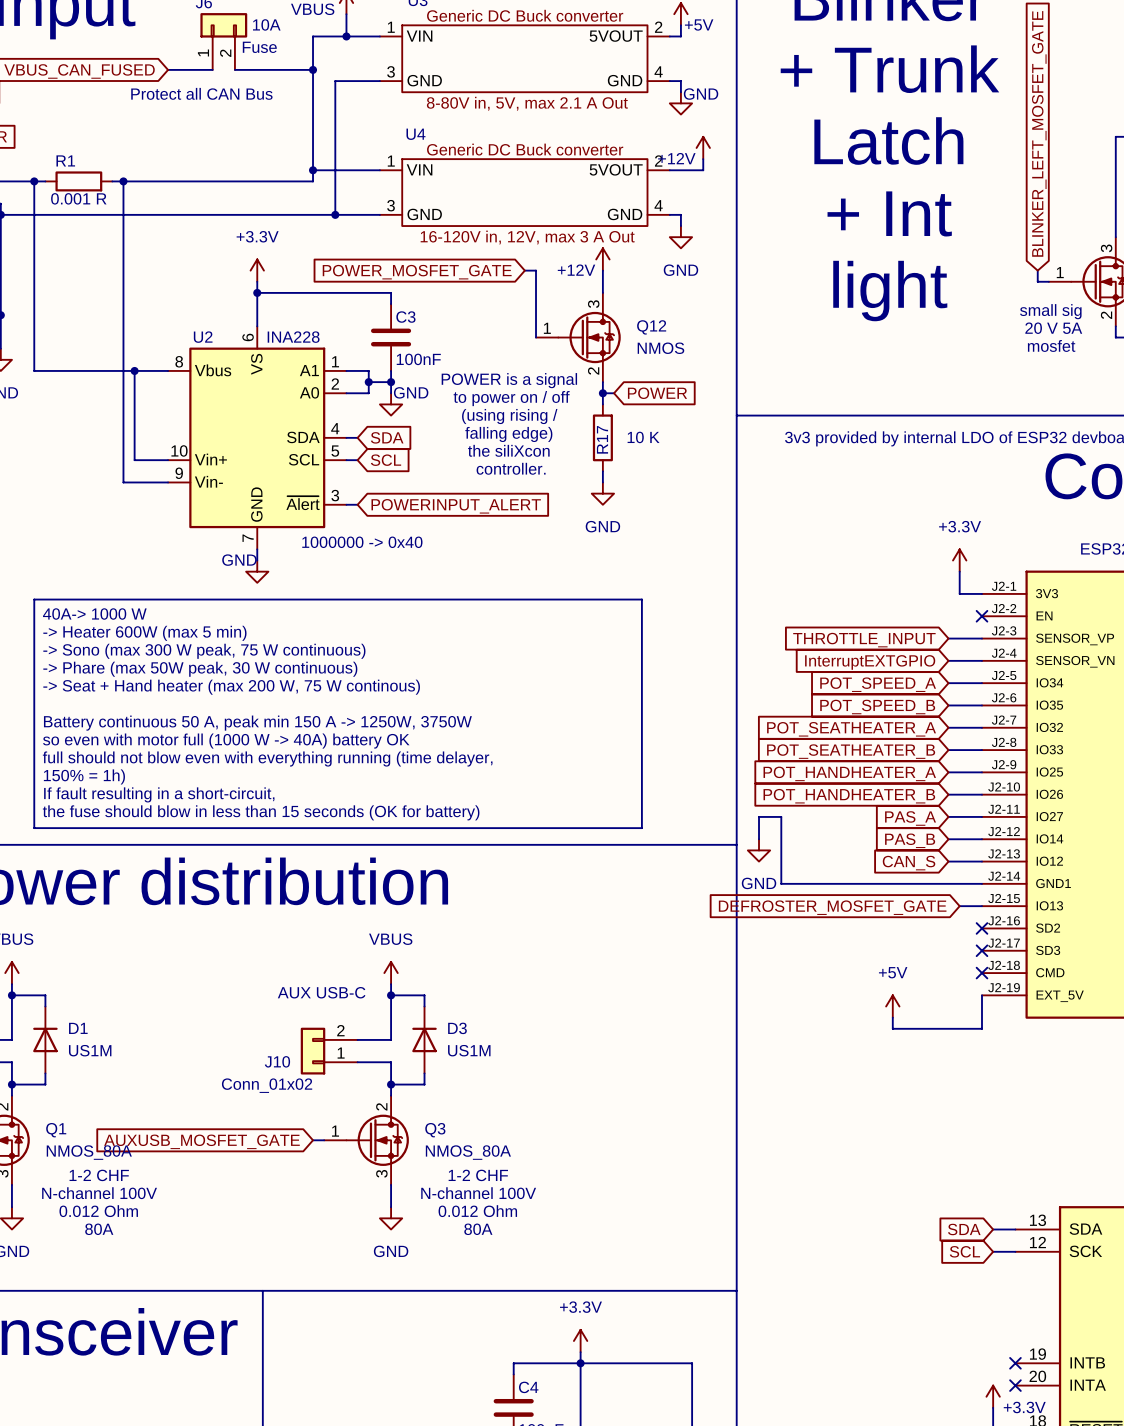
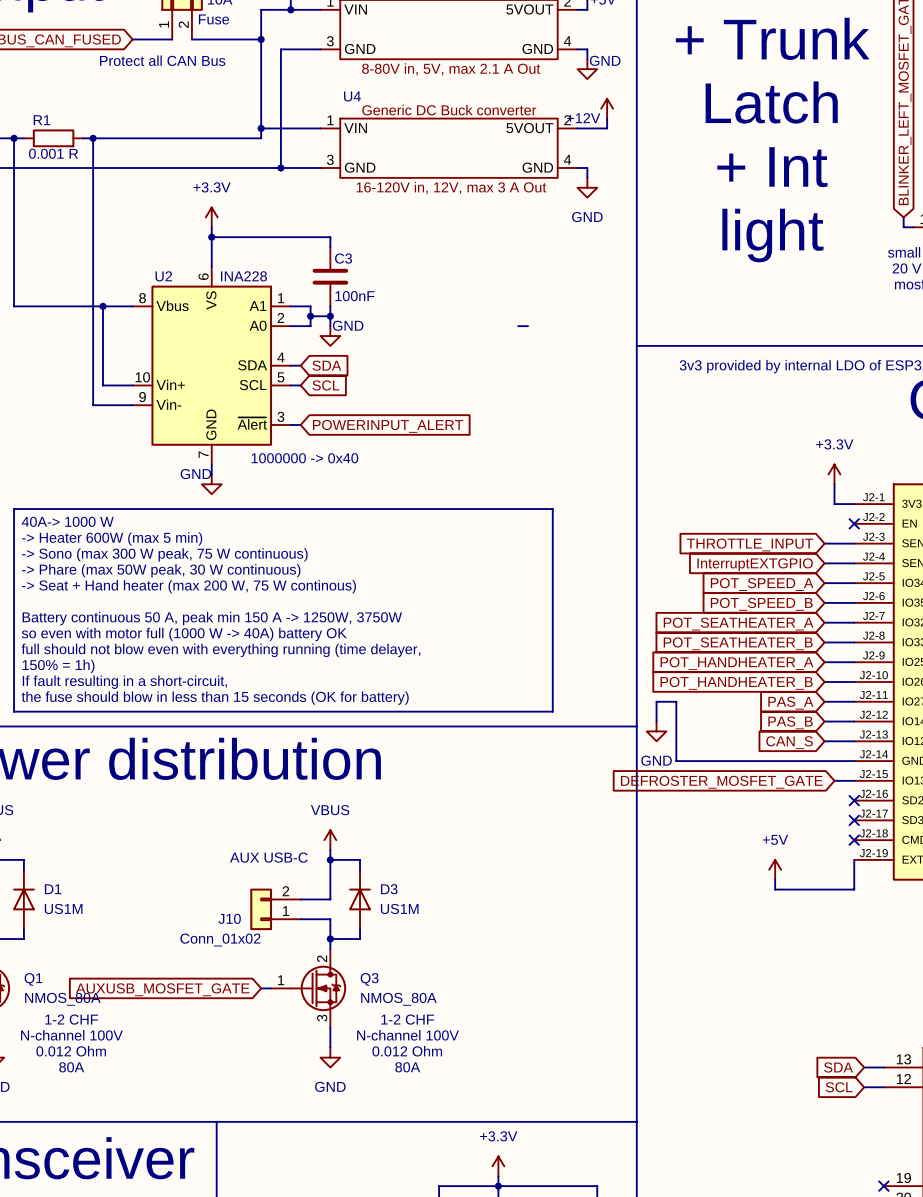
power symbol: +12V (602, 259) -> none
wire: (524, 270) (536, 270) (536, 337) -> none
wire: (602, 270) (602, 292) -> none
global label: POWER_MOSFET_GATE (417, 272) -> none
Q12: NMOS (578, 337) -> none
text: POWER is a signal (509, 380) -> none
wire: (602, 382) (602, 404) -> none
junction: (602, 393) -> none
global label: POWER (657, 393) -> none
text: to power on / off (511, 398) -> none
text: (using rising / (509, 416) -> none
text: falling edge) (508, 434) -> none
R17: 10 K (602, 437) -> none
text: the siliXcon (508, 450) -> none
text: controller. (511, 468) -> none
wire: (602, 471) (602, 482) -> none
power symbol: GND (602, 493) -> none

